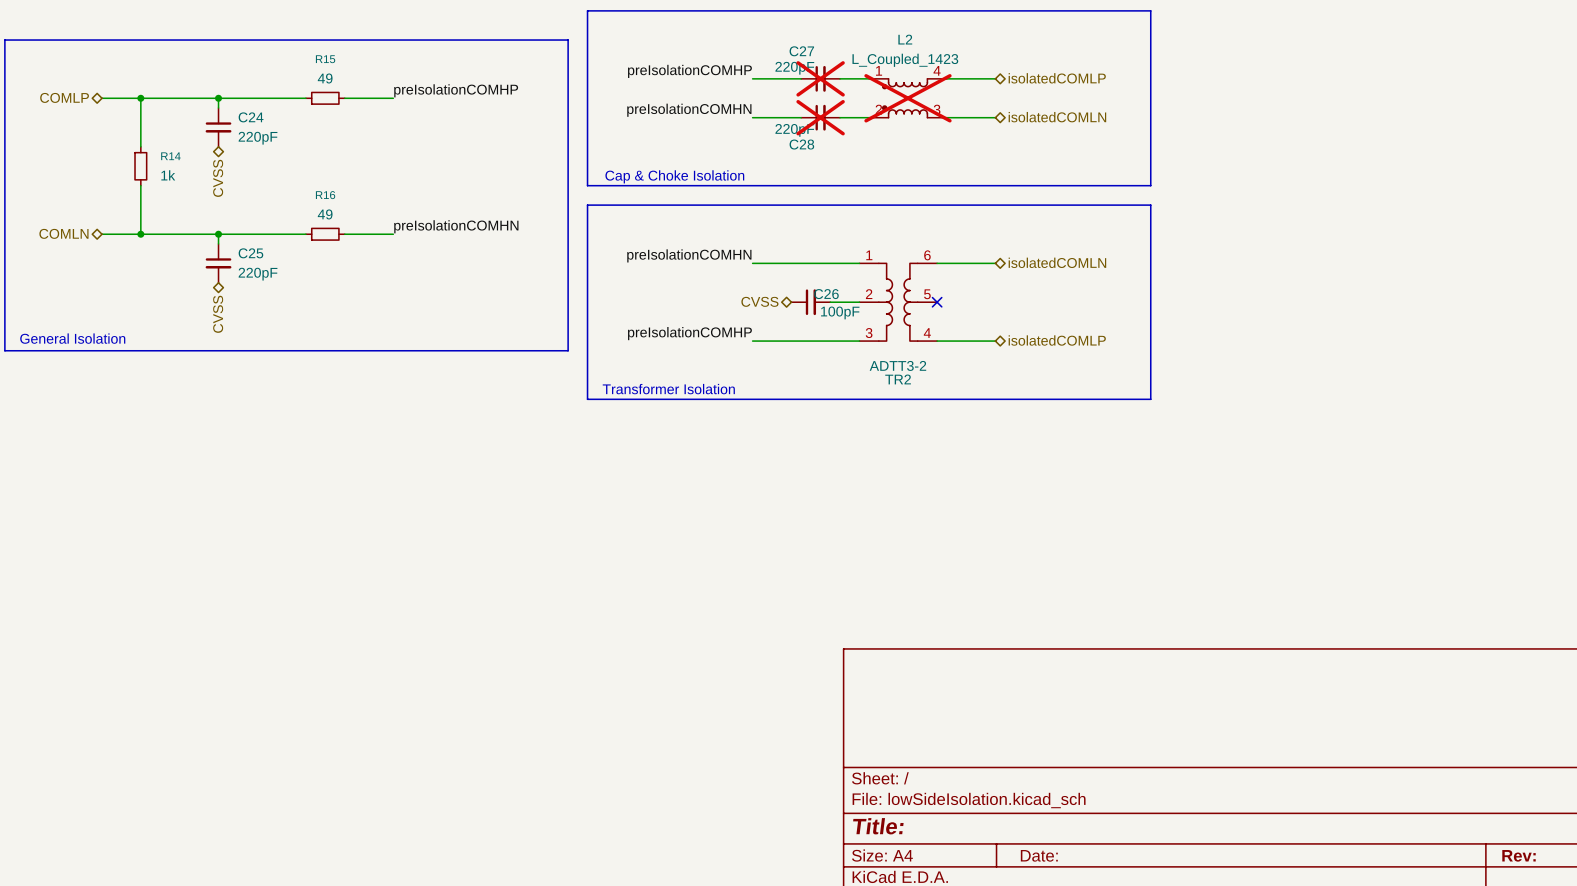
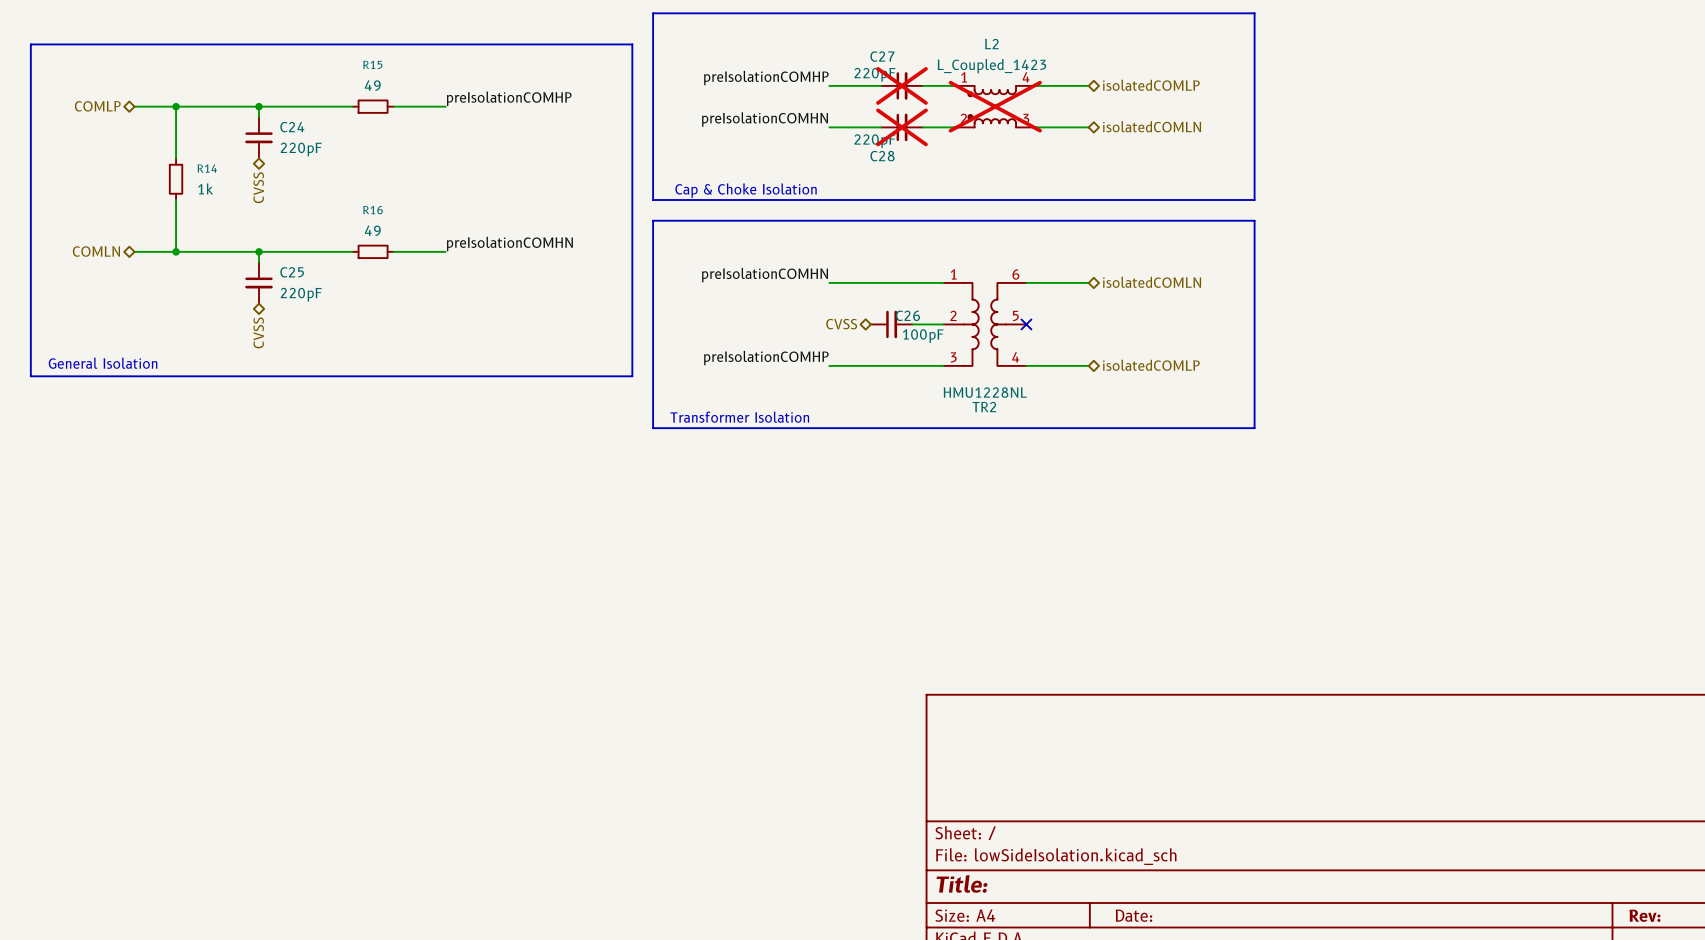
TR2 value: ADTT3-2 (897, 365) -> HMU1228NL (985, 392)

